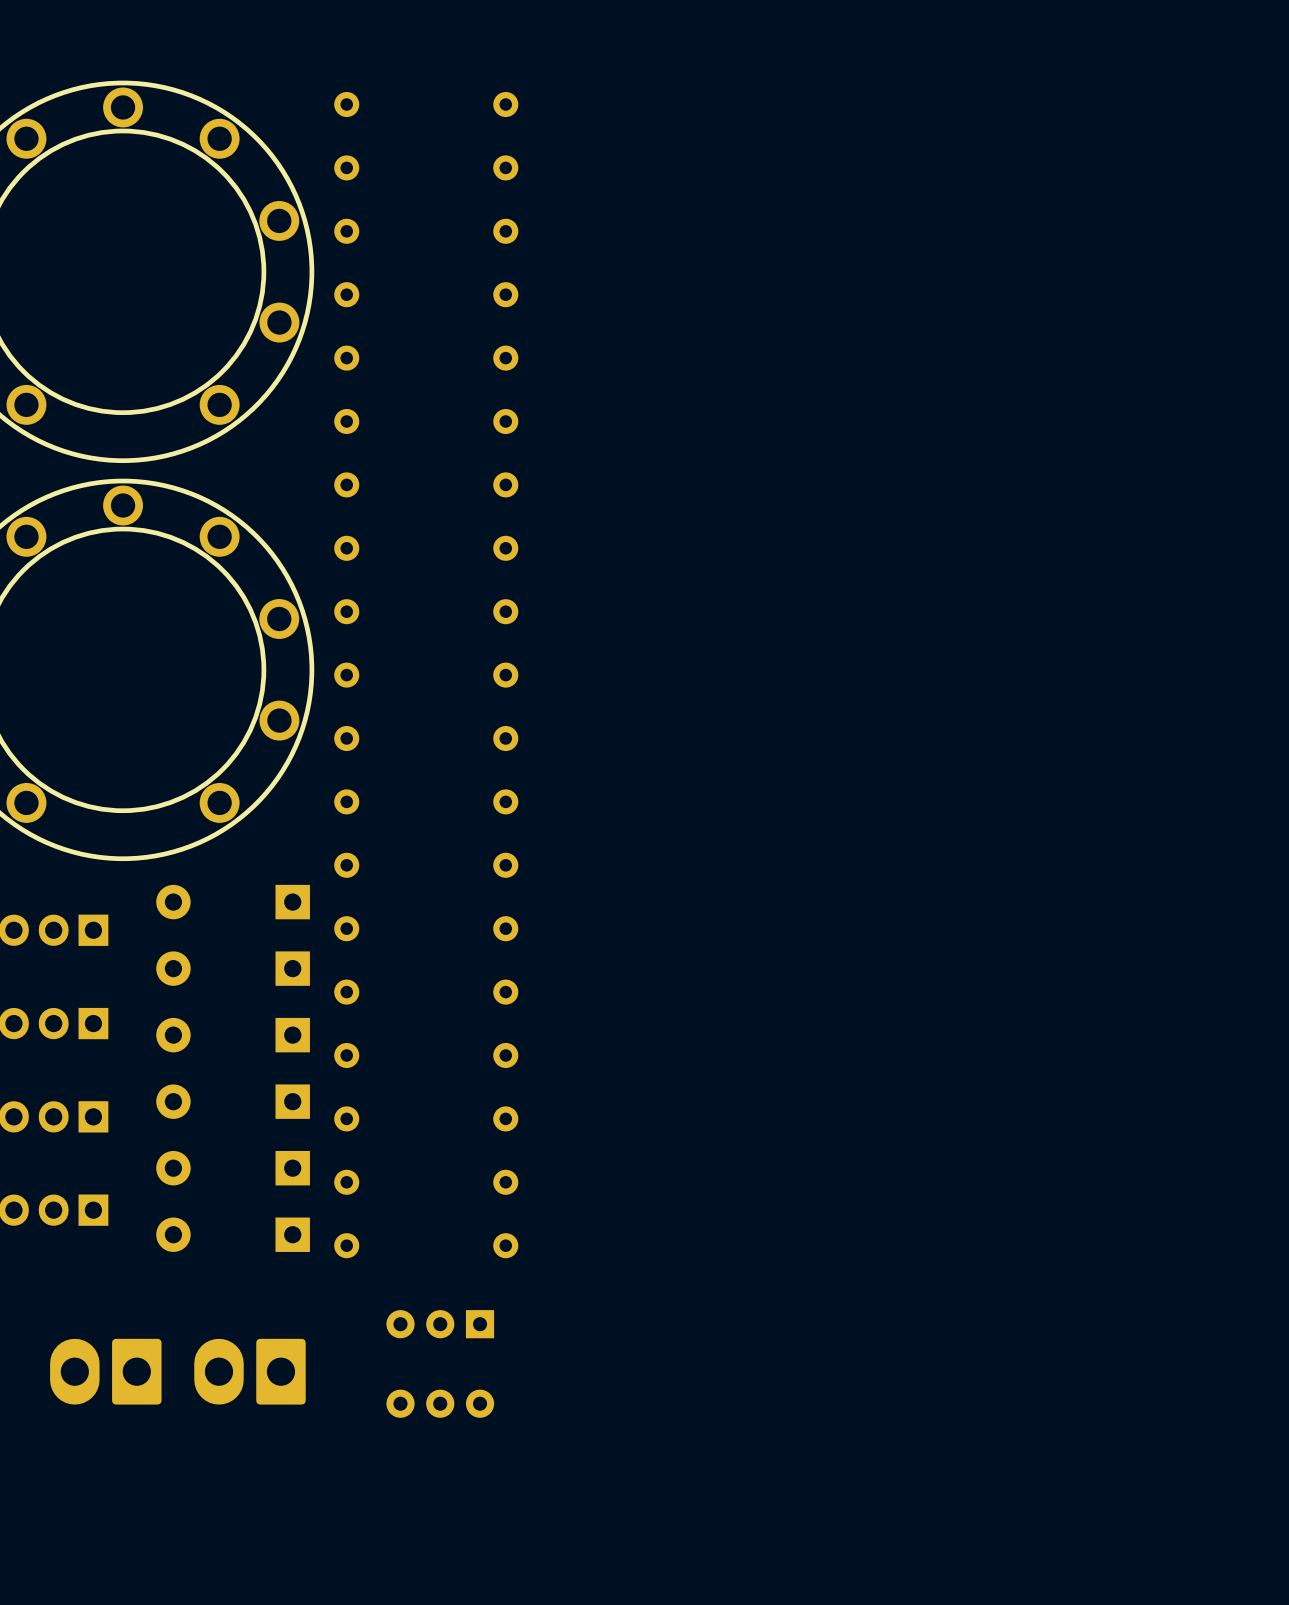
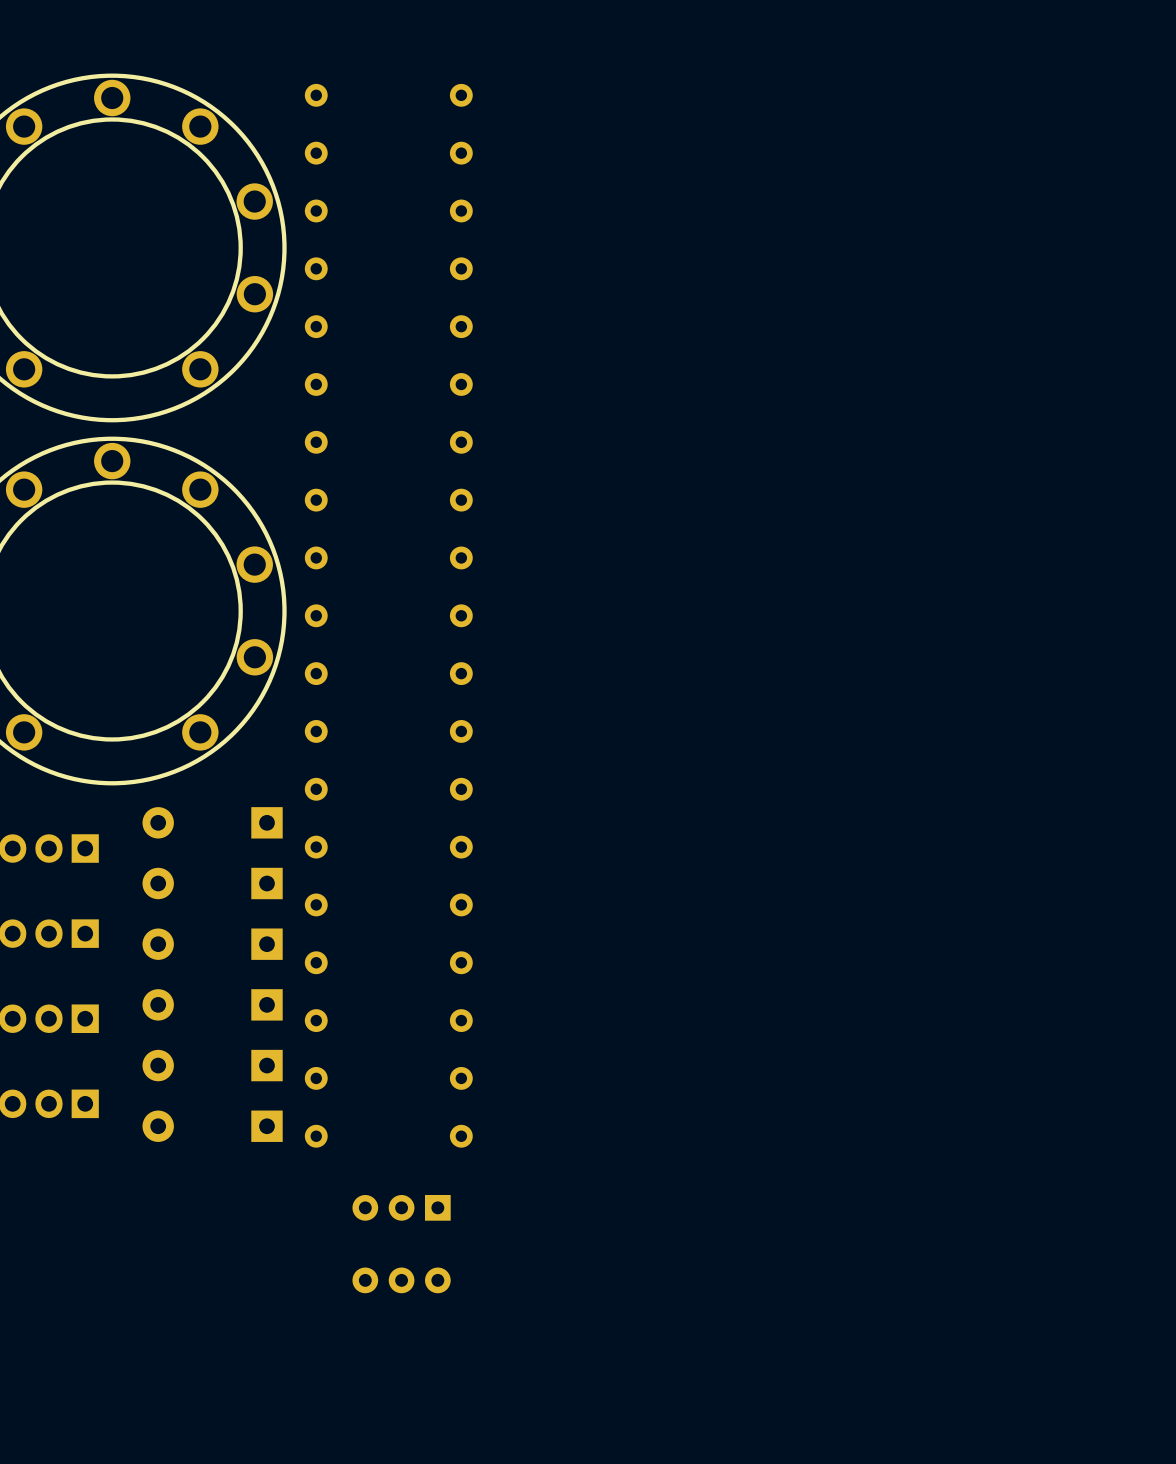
part: (105, 1371) -> none
part: (249, 1371) -> none

